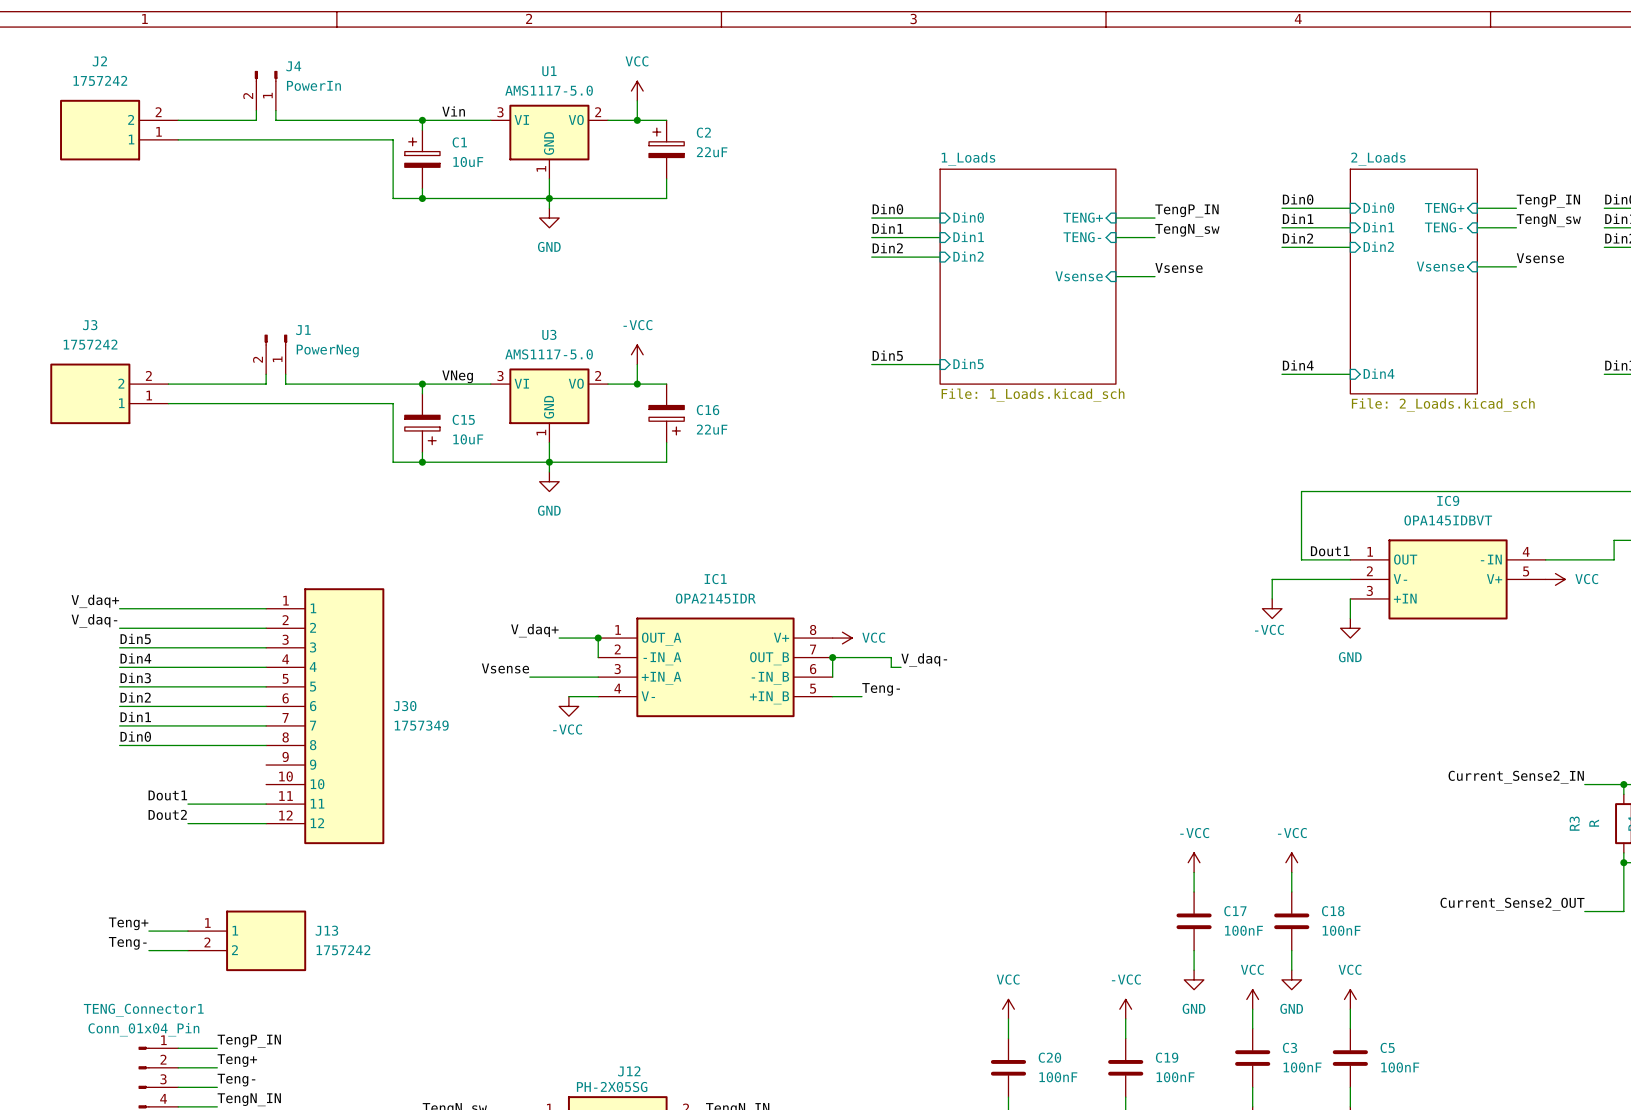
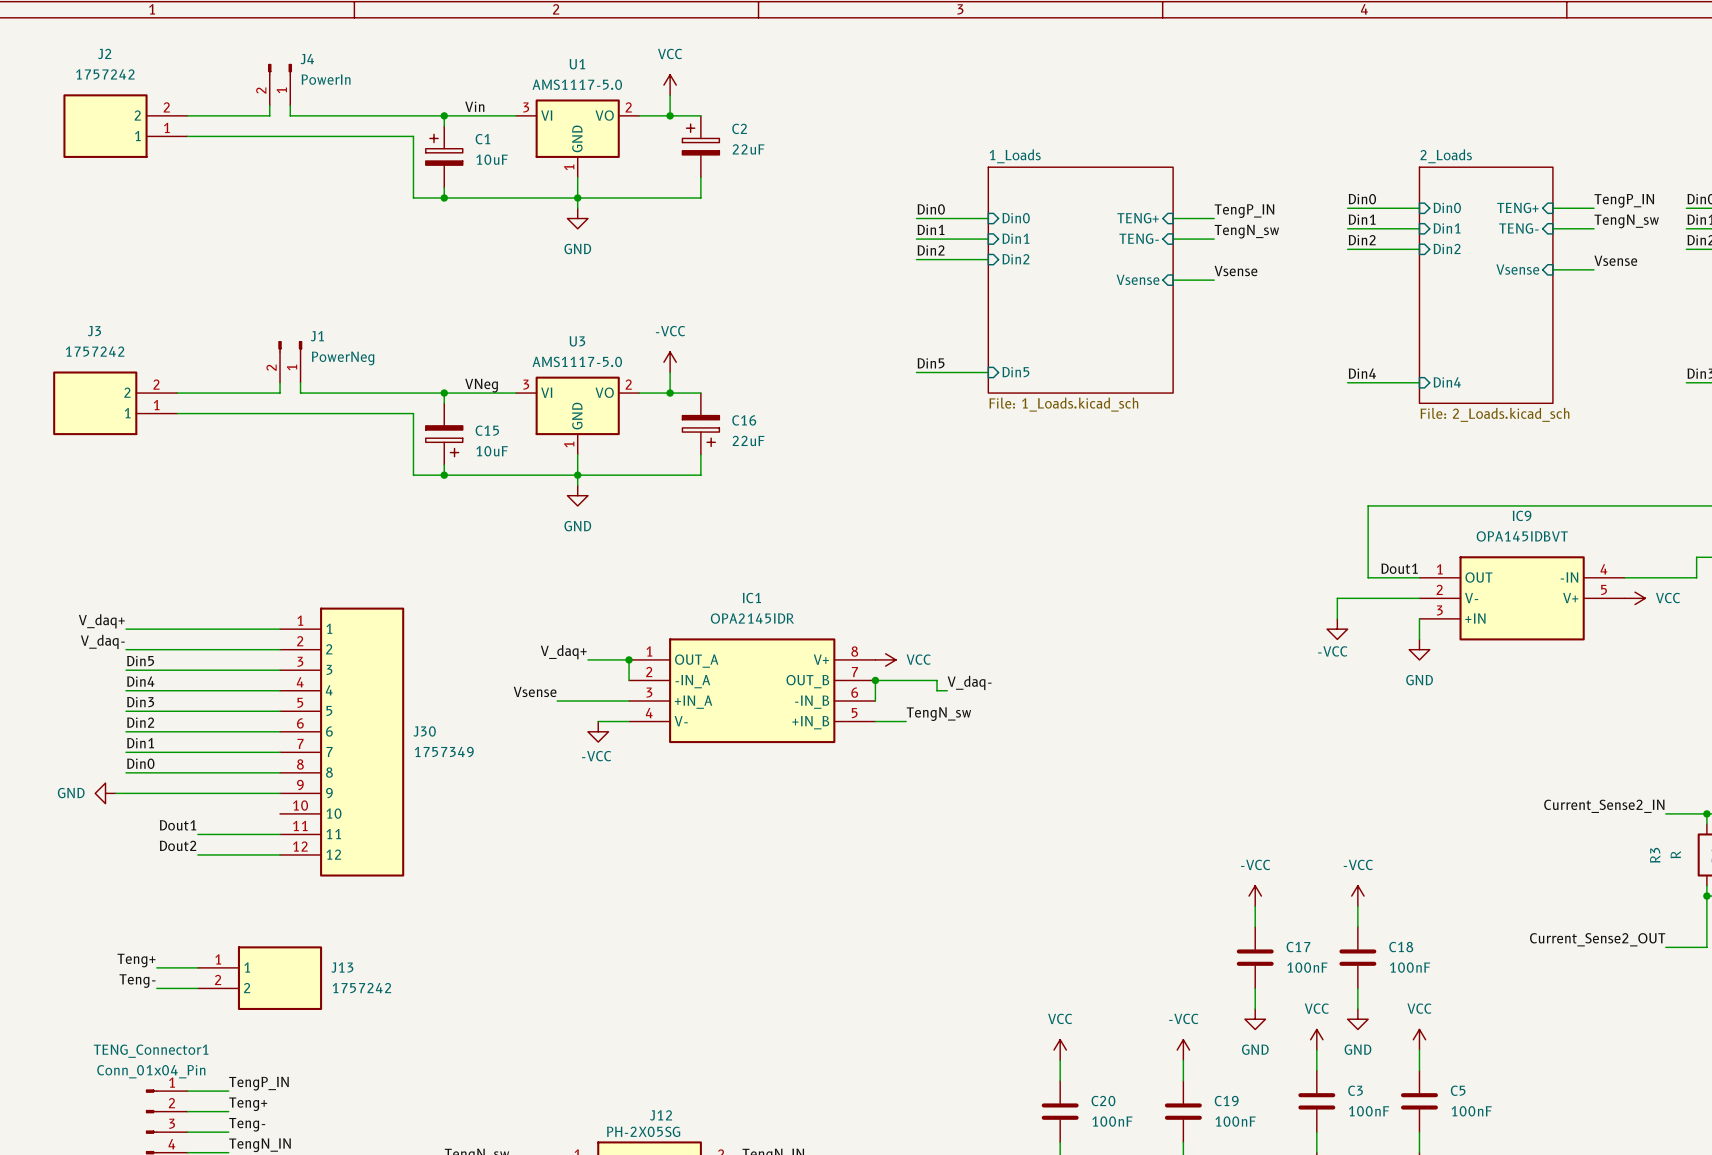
label: Teng- (881, 689) -> TengN_sw (938, 714)
power symbol: none -> GND (105, 793)
wire: none -> (115, 793) (280, 793)

